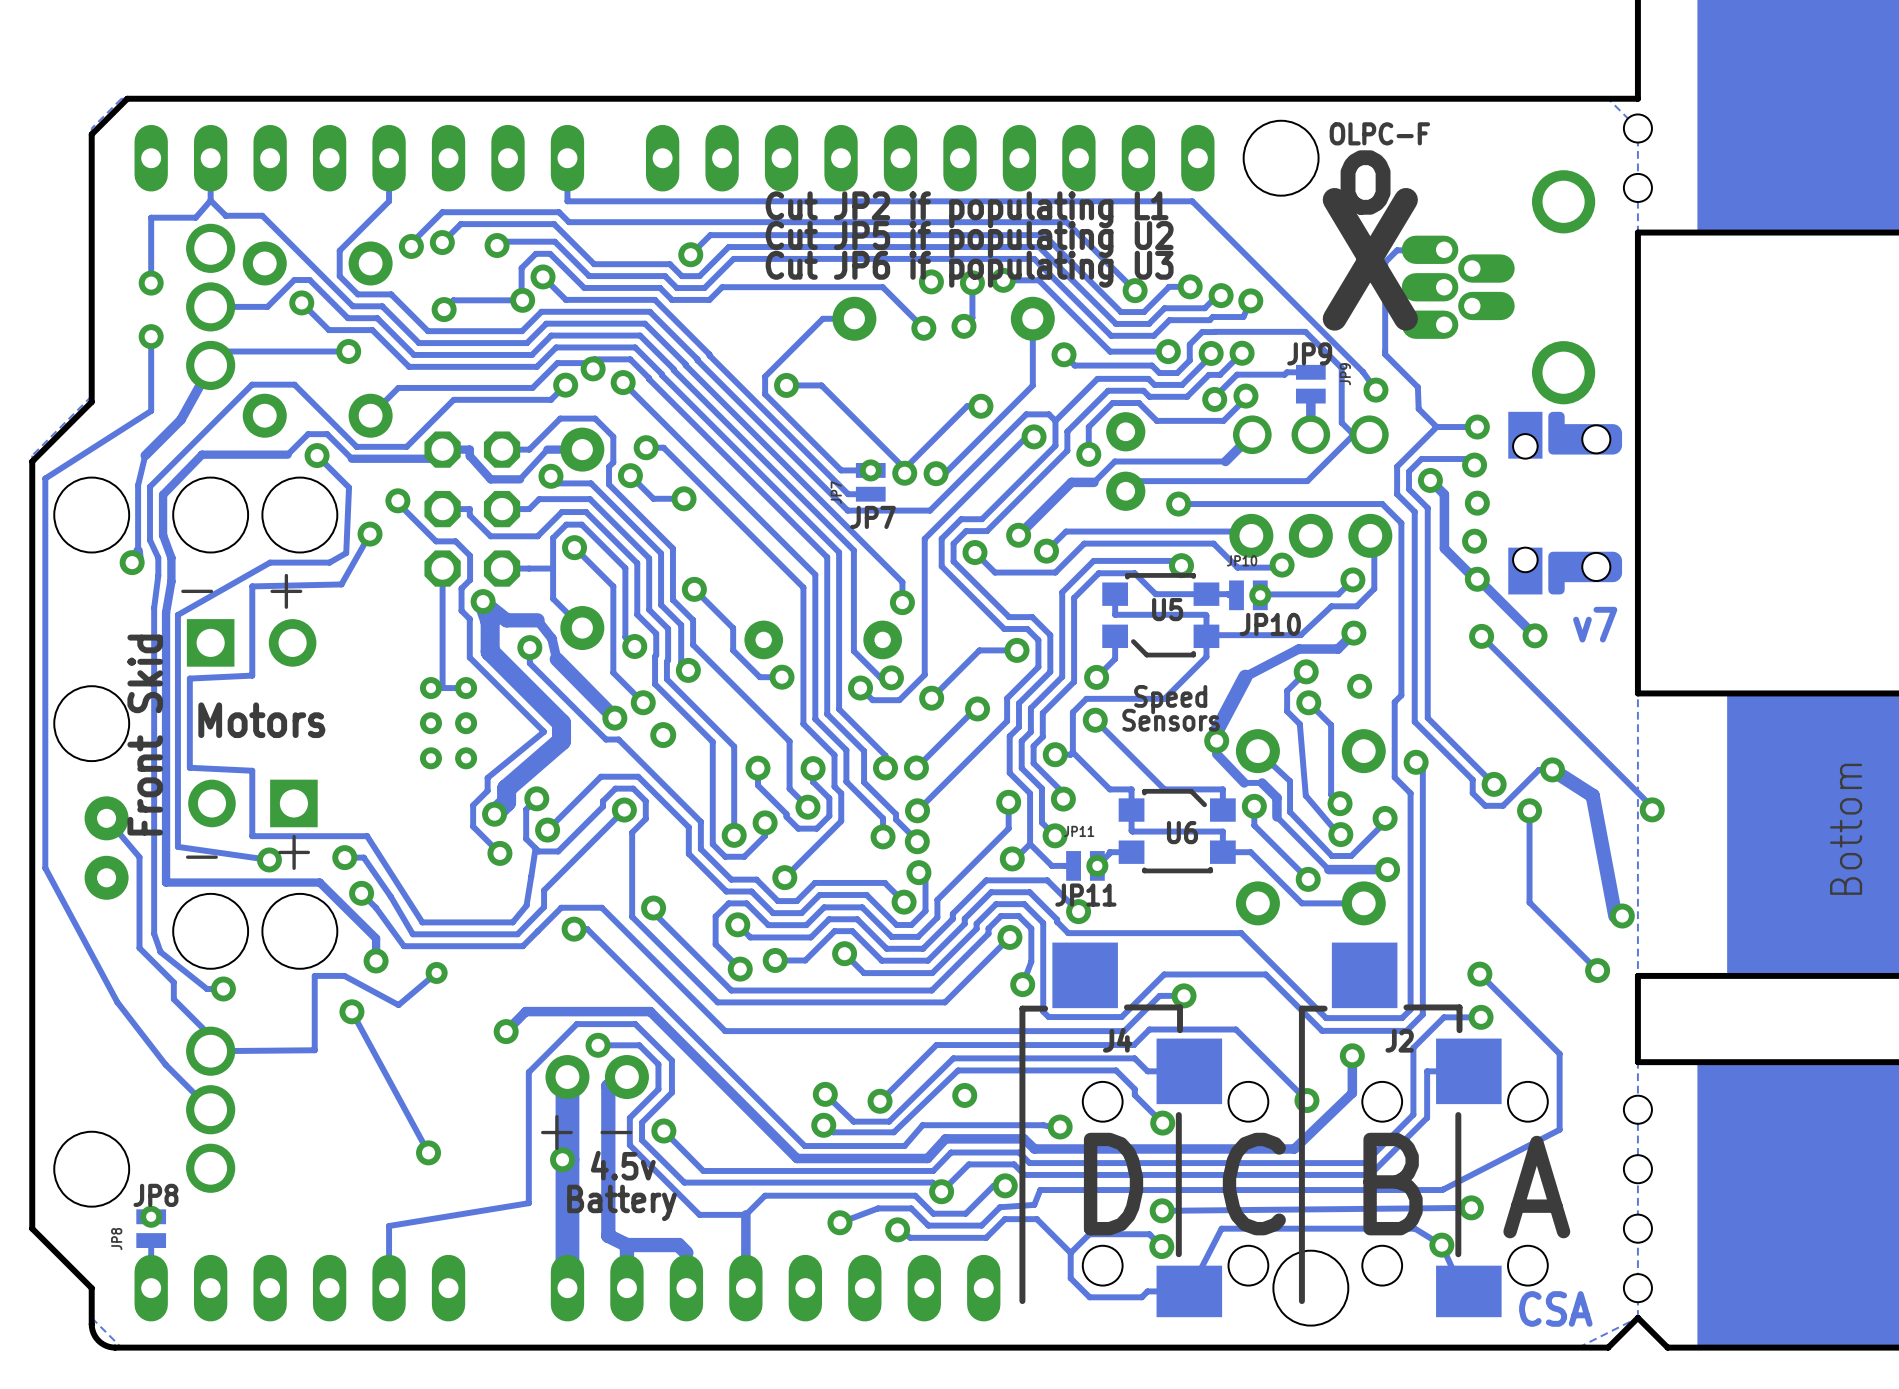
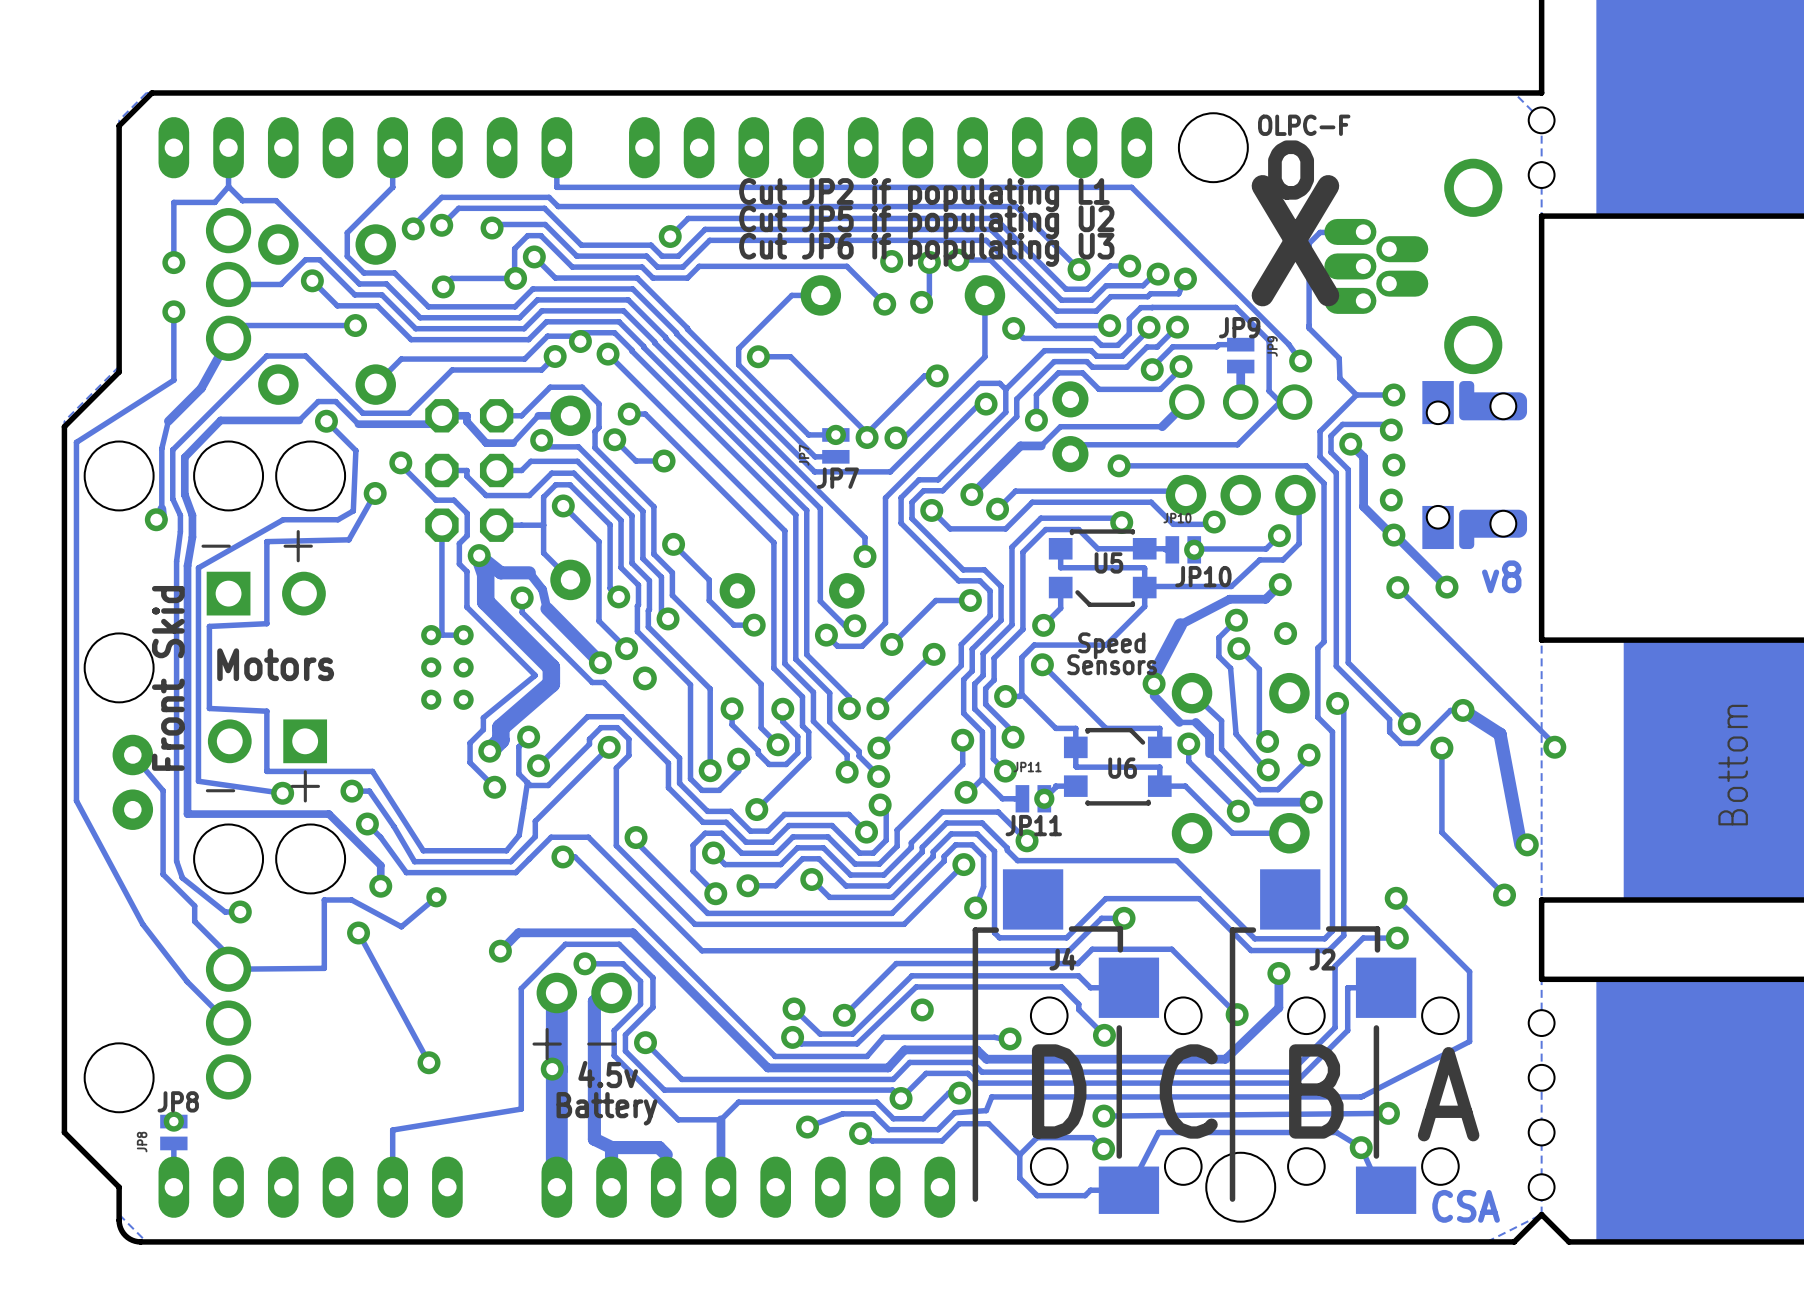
text: v7 (1595, 624) -> v8 (1501, 576)

